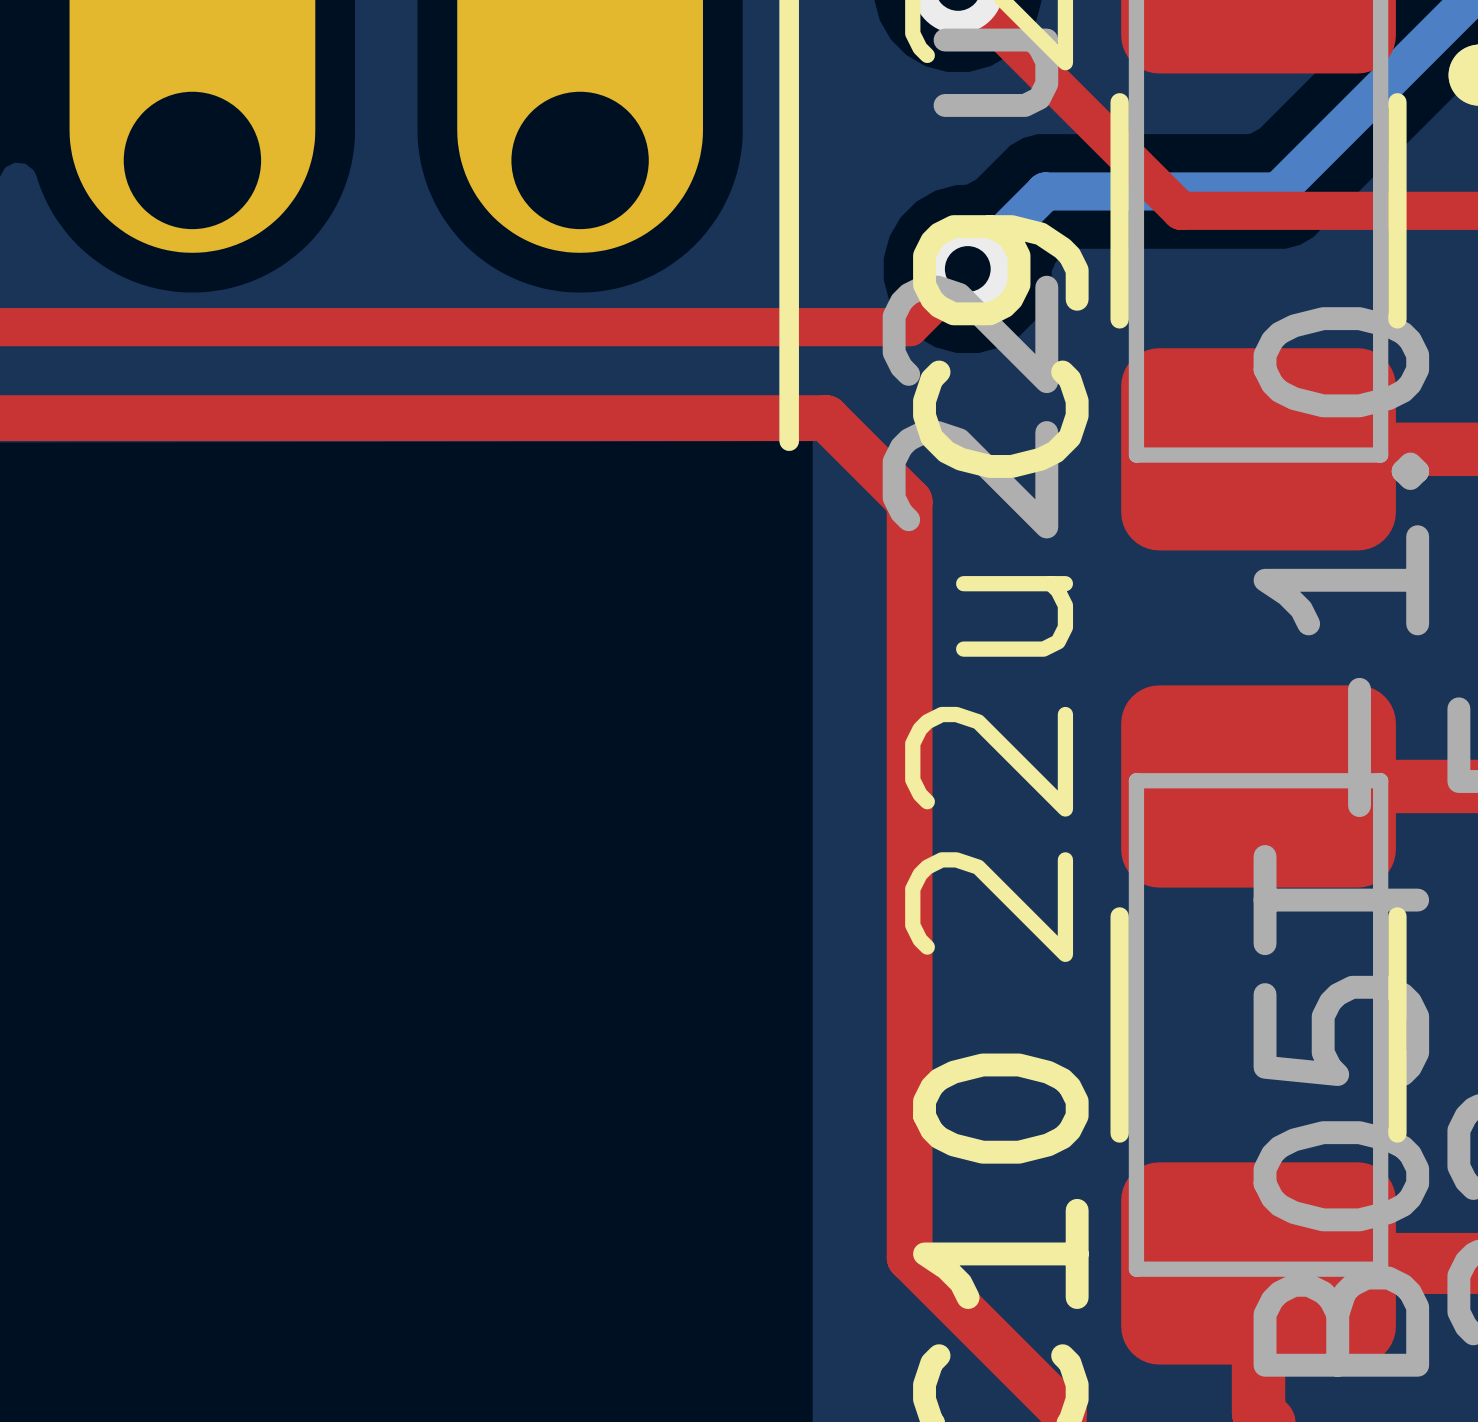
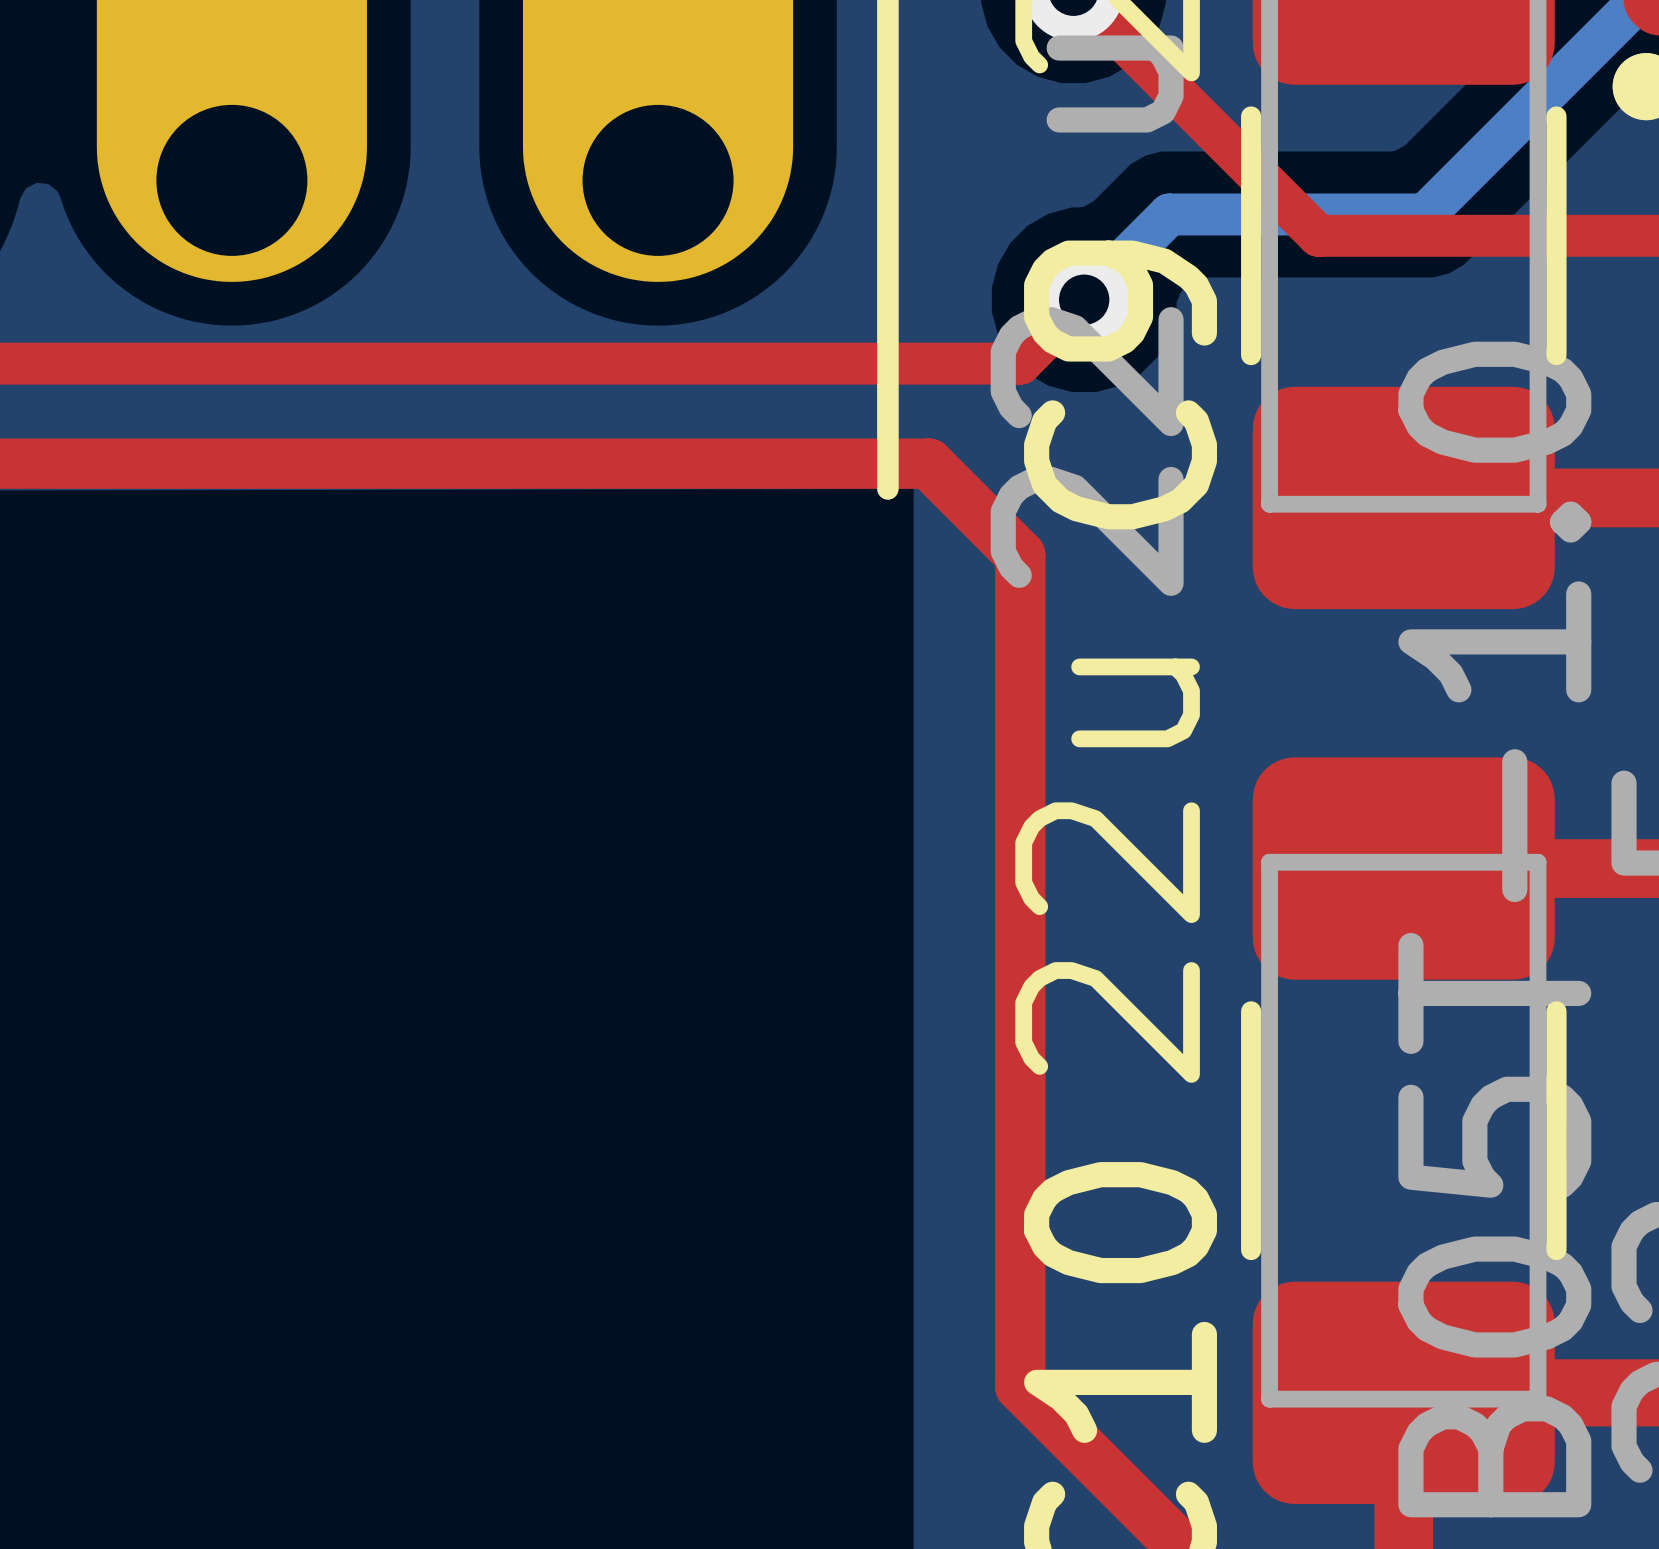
text position: 22u (989, 769) -> 22u (1107, 870)

